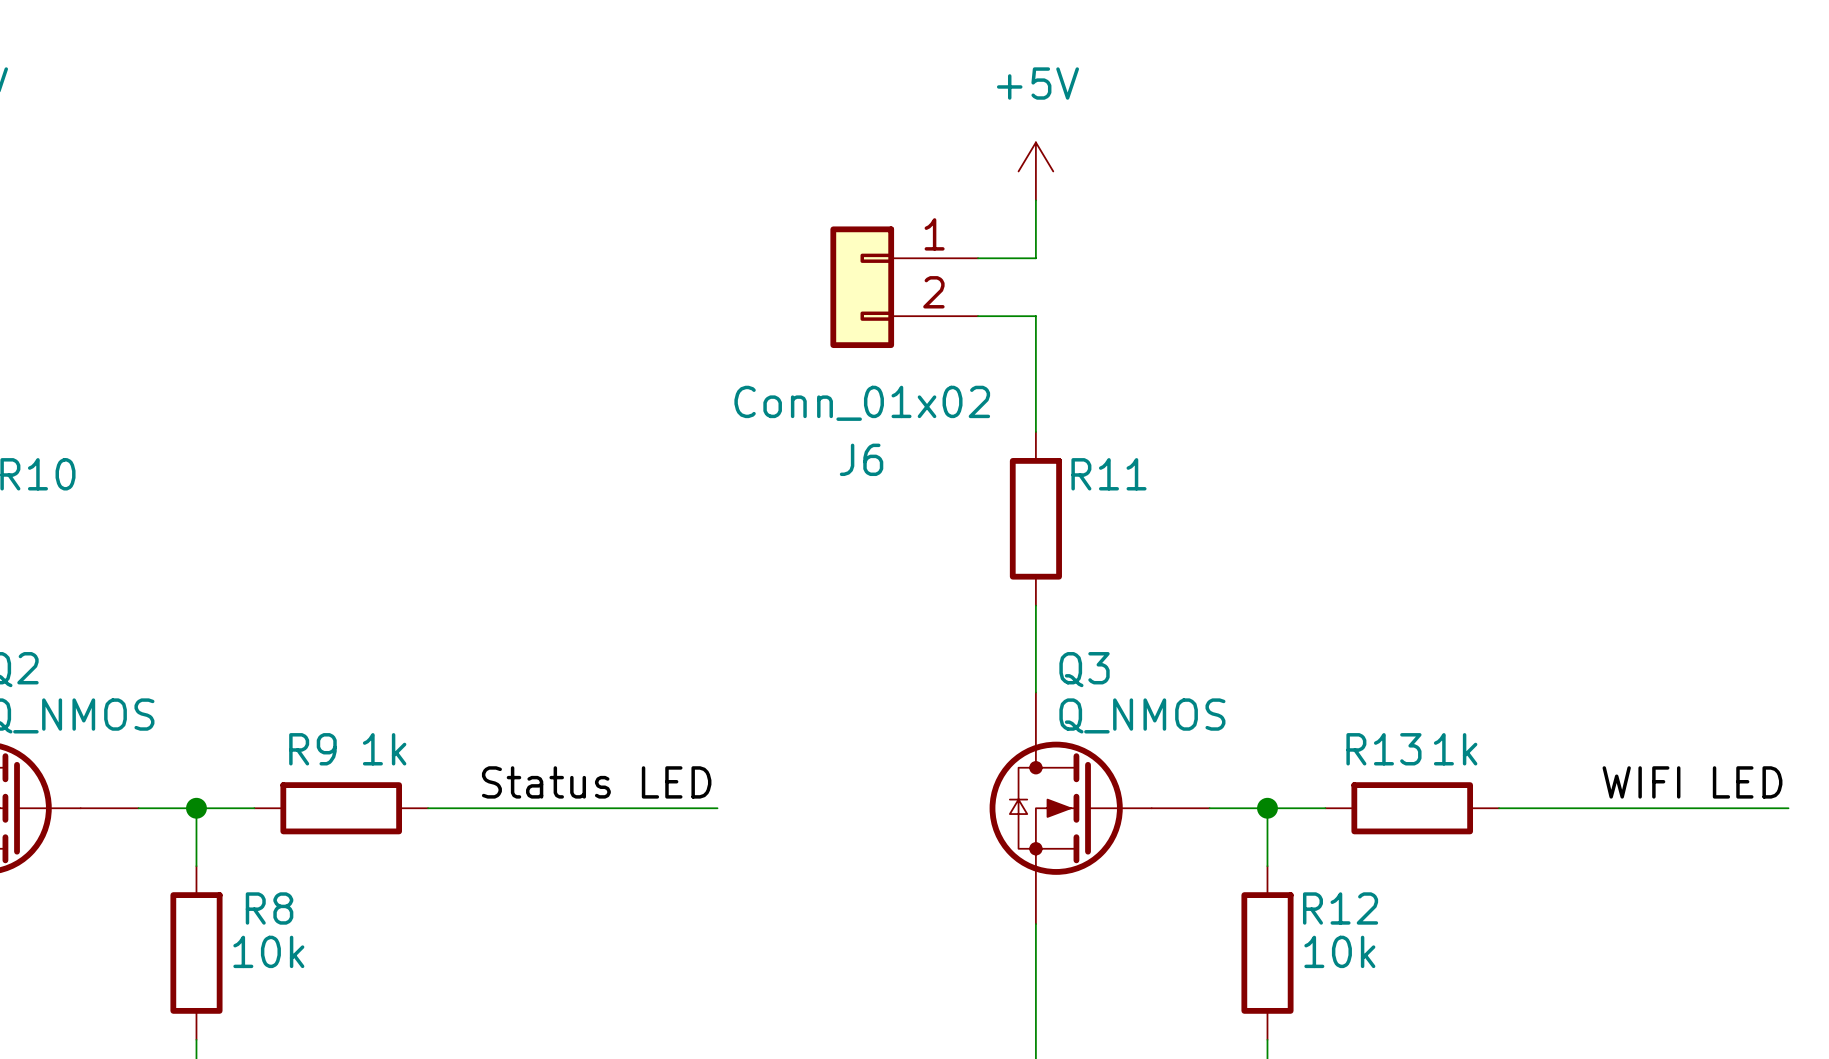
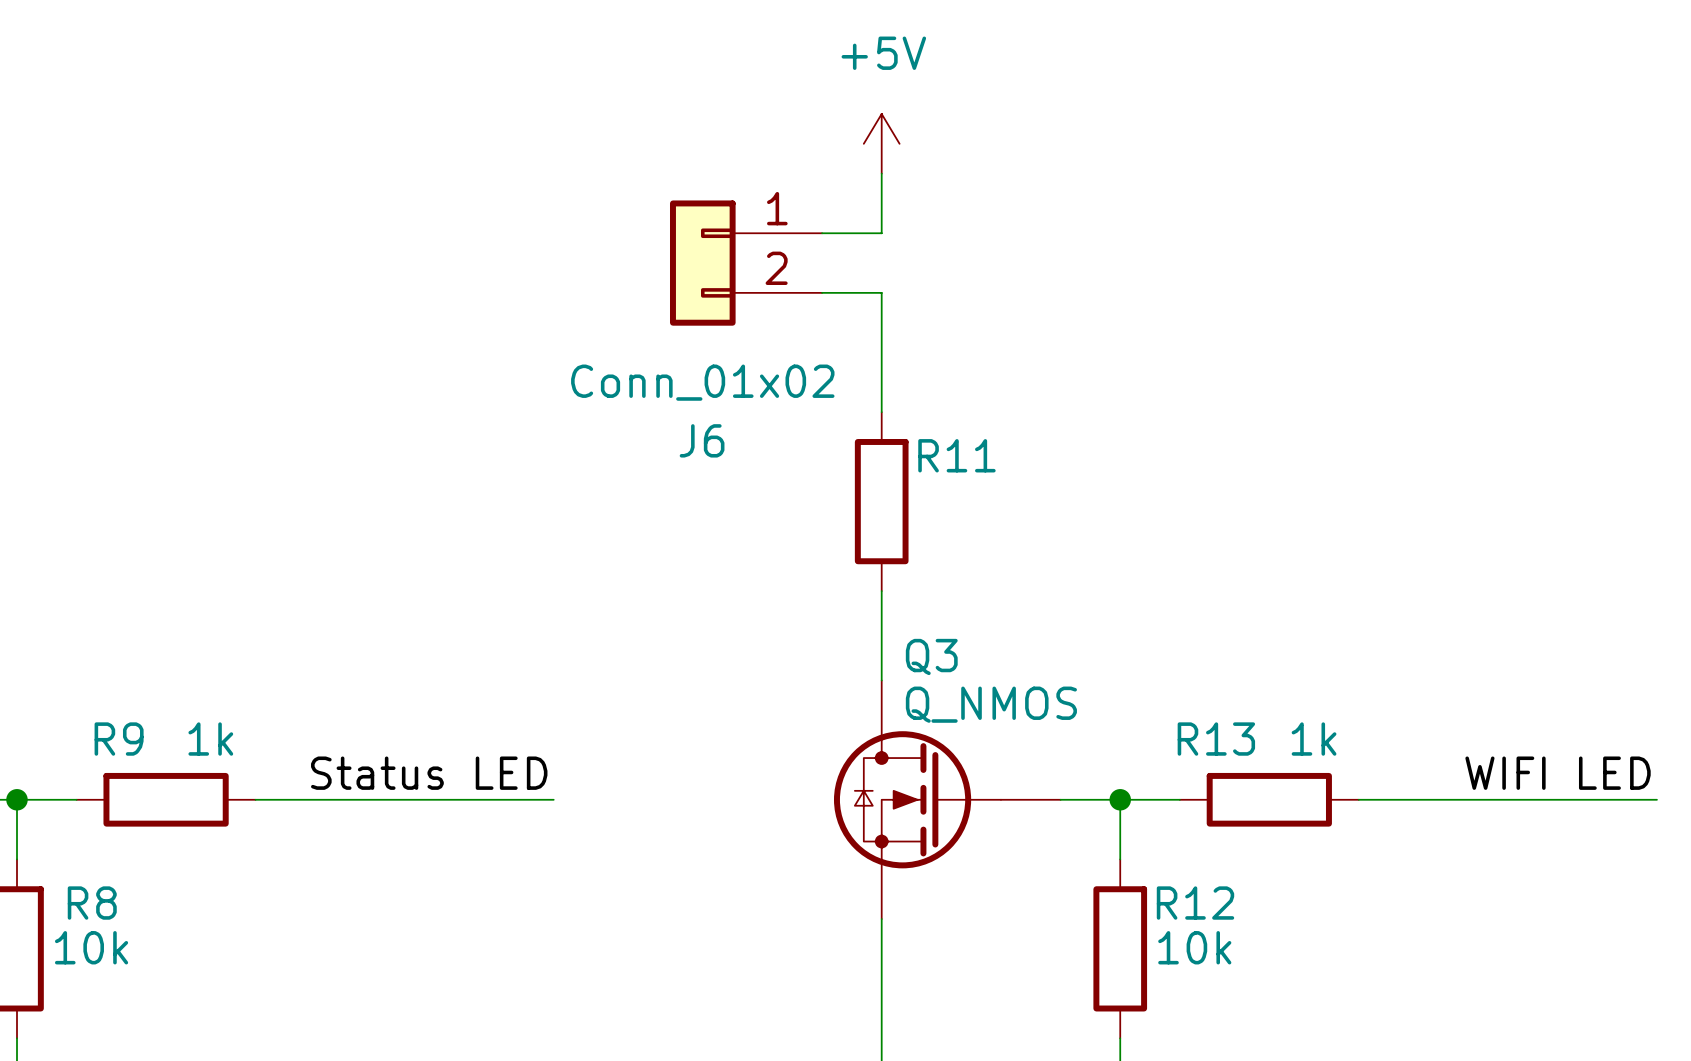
R9 name position: R9 (312, 749) -> R9 (119, 739)
R13 name position: R13 (1383, 749) -> R13 (1216, 739)

